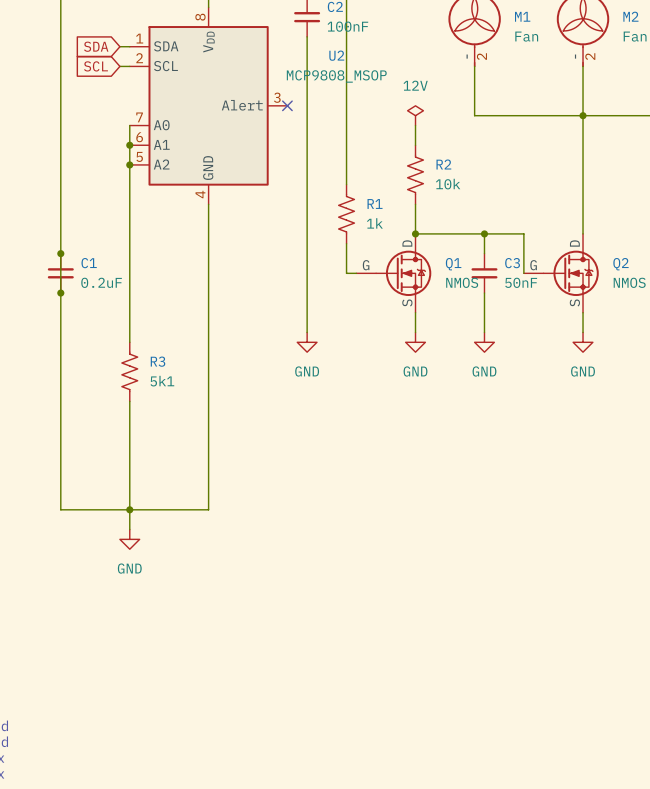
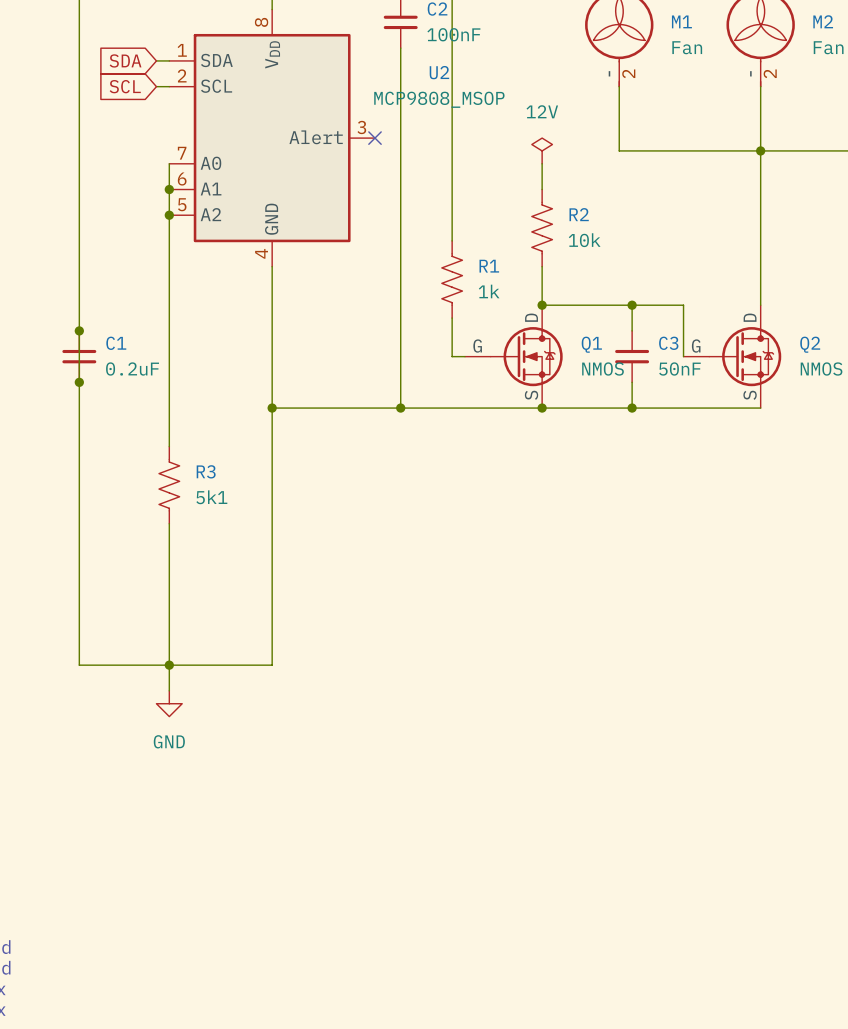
junction: none -> (272, 408)
wire: (307, 312) (307, 332) -> none
junction: none -> (400, 408)
wire: (415, 312) (415, 332) -> none
junction: none -> (542, 408)
wire: (484, 312) (484, 332) -> none
junction: none -> (632, 408)
wire: (583, 312) (583, 332) -> (760, 408) (272, 408)
power symbol: GND (307, 342) -> none
power symbol: GND (415, 342) -> none
power symbol: GND (484, 342) -> none
power symbol: GND (583, 342) -> none

